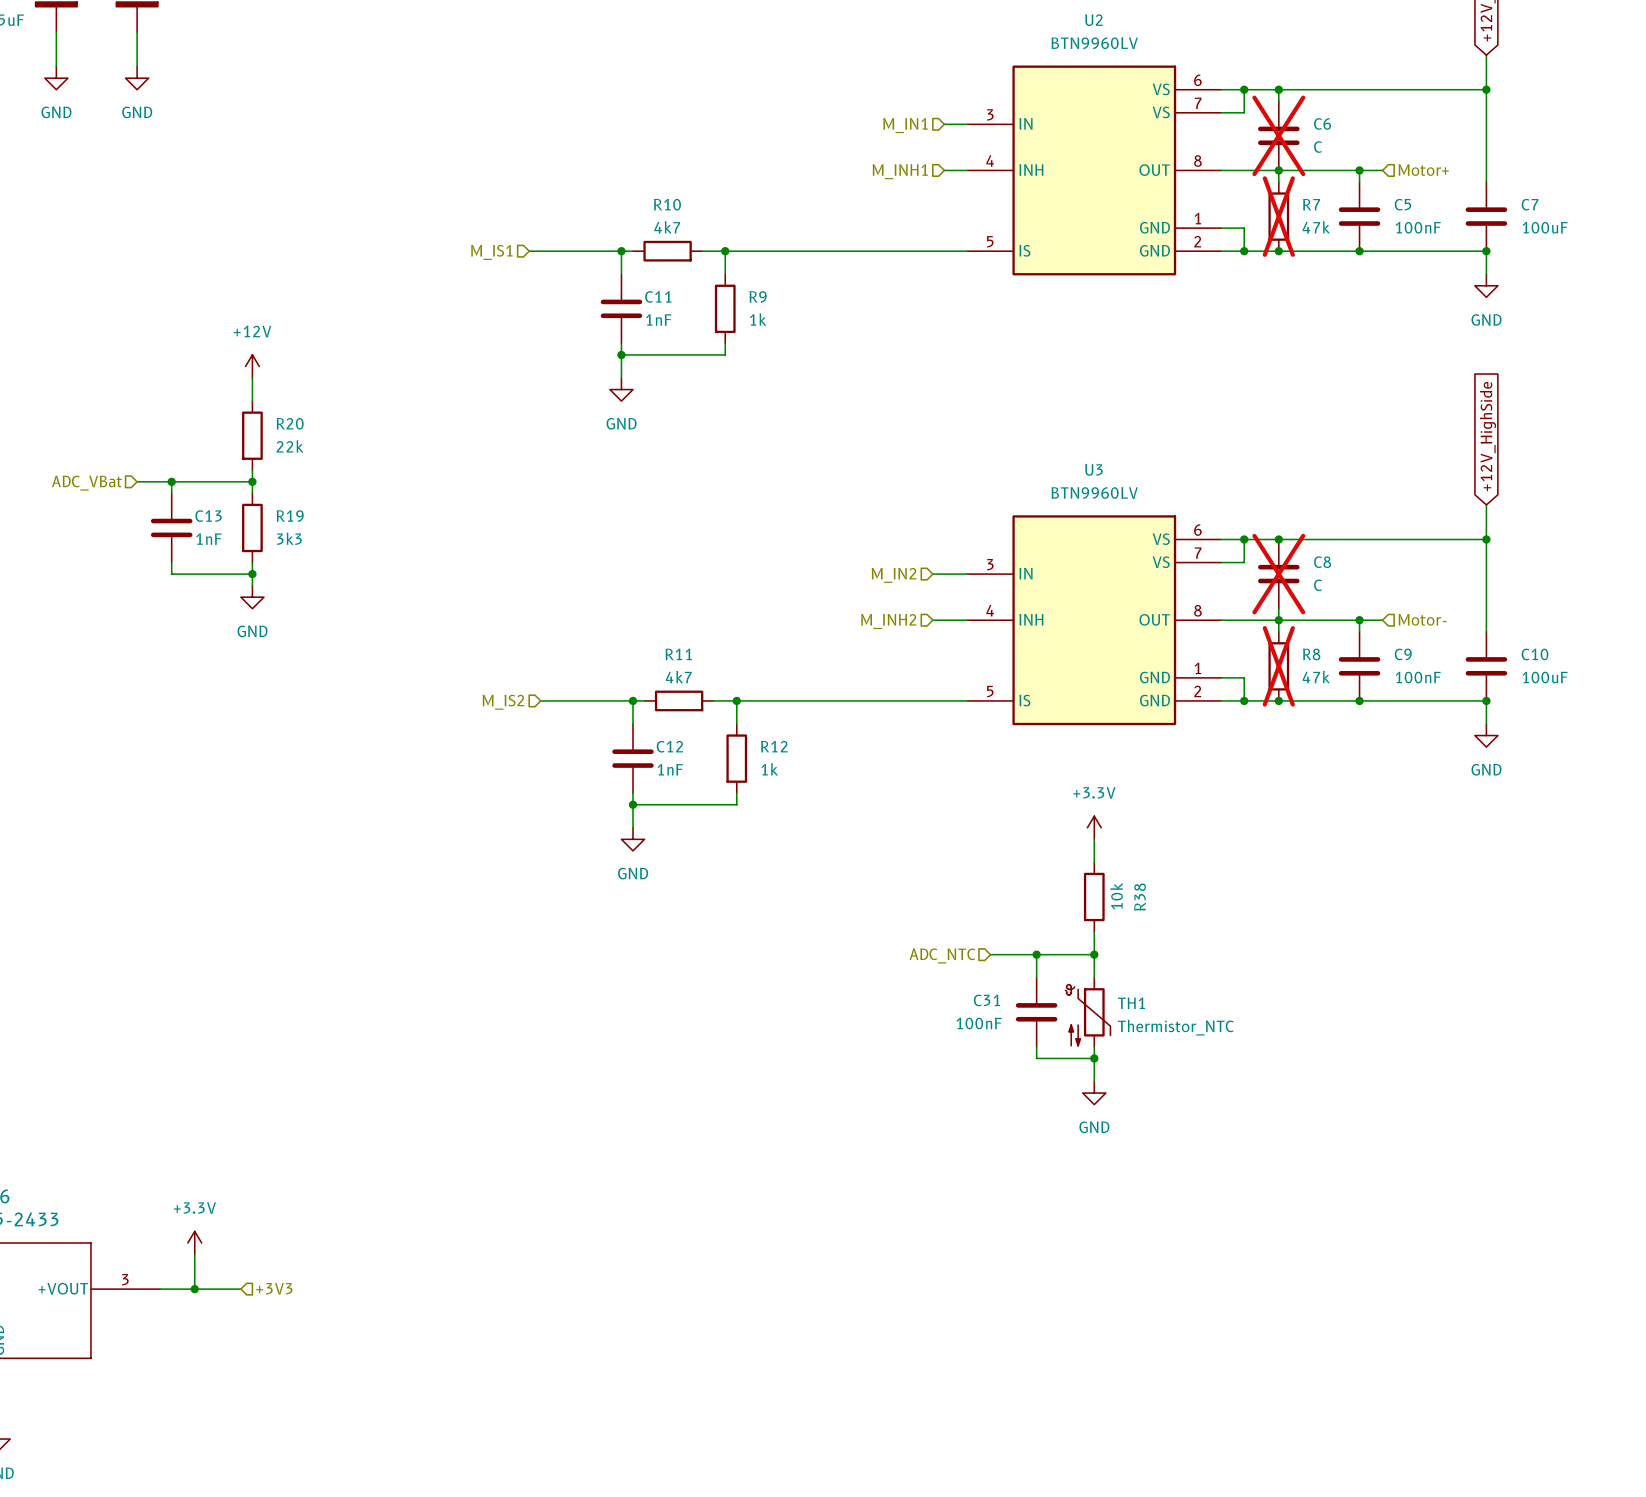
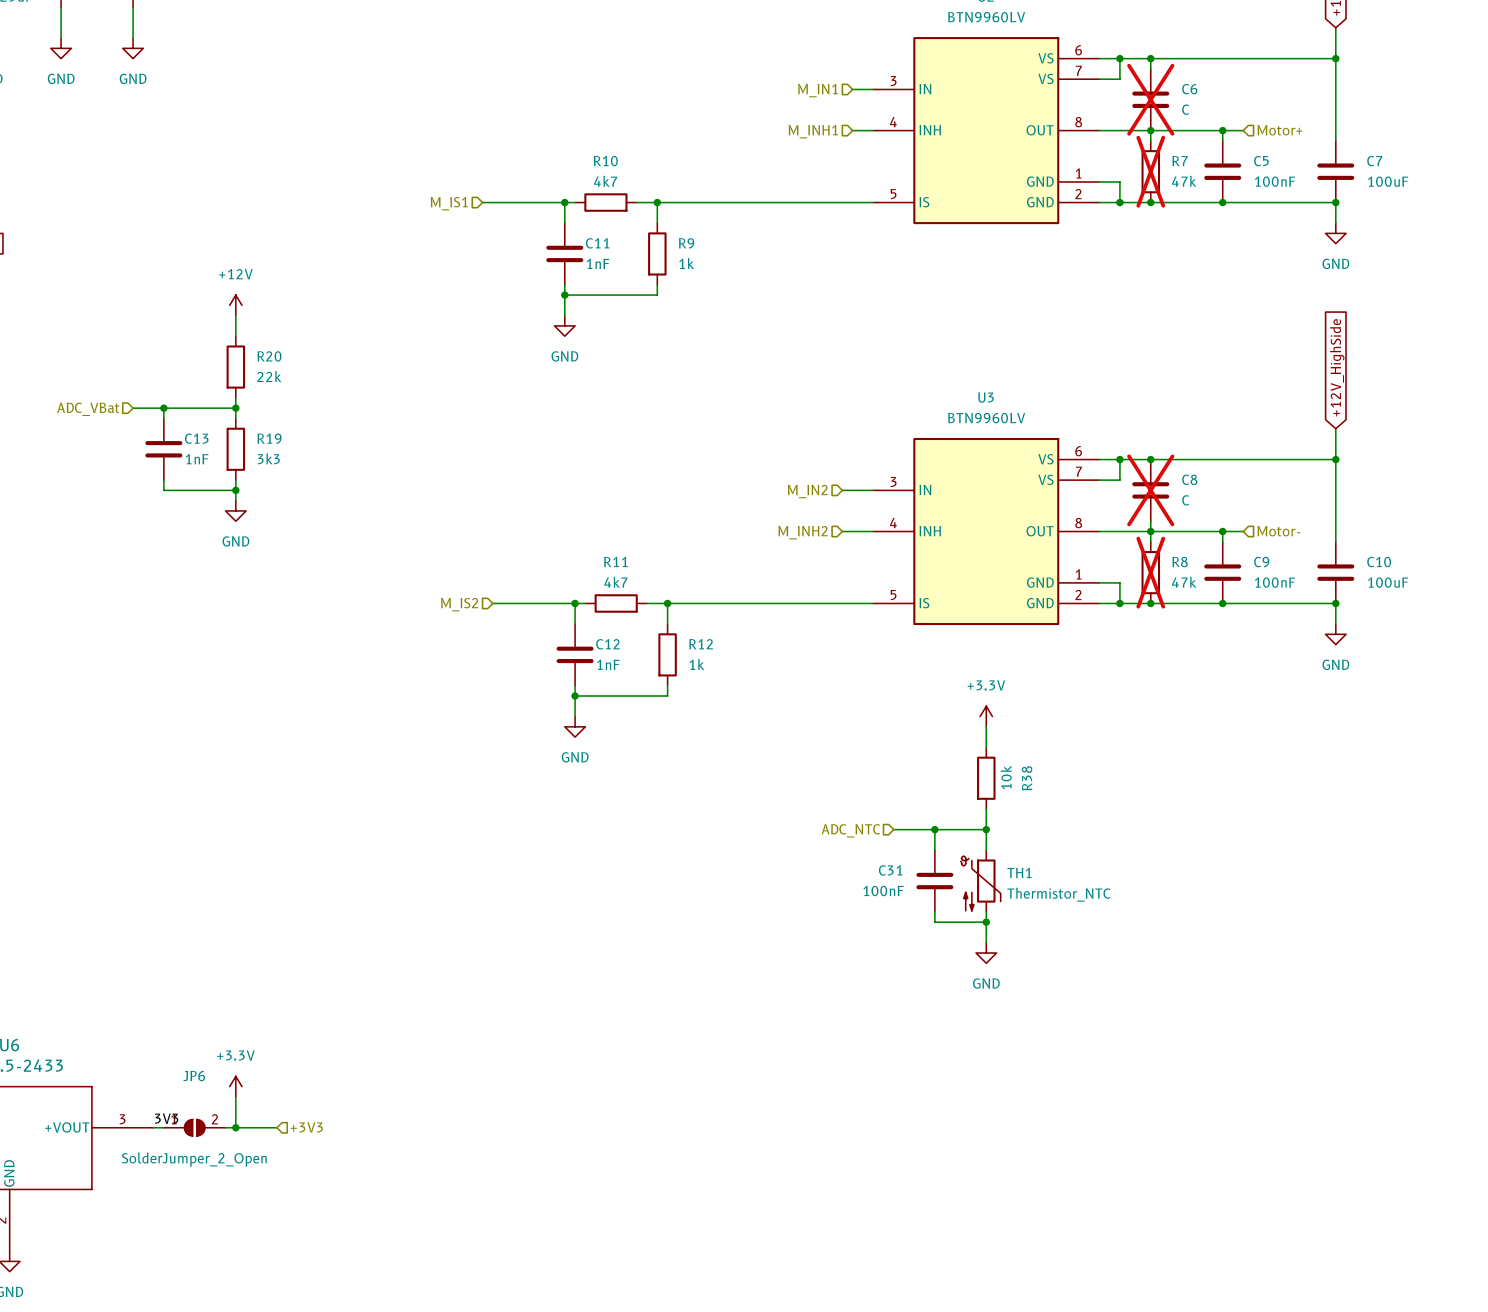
power symbol position: +3.3V (194, 1242) -> +3.3V (235, 1086)
wire: (194, 1254) (194, 1289) -> (235, 1096) (235, 1127)
label: none -> 3V3 (166, 1118)
hierarchical label position: +3V3 (274, 1288) -> +3V3 (306, 1127)
junction: (194, 1289) -> none
JP6: none -> SolderJumper_2_Open (194, 1127)
junction: none -> (235, 1127)

